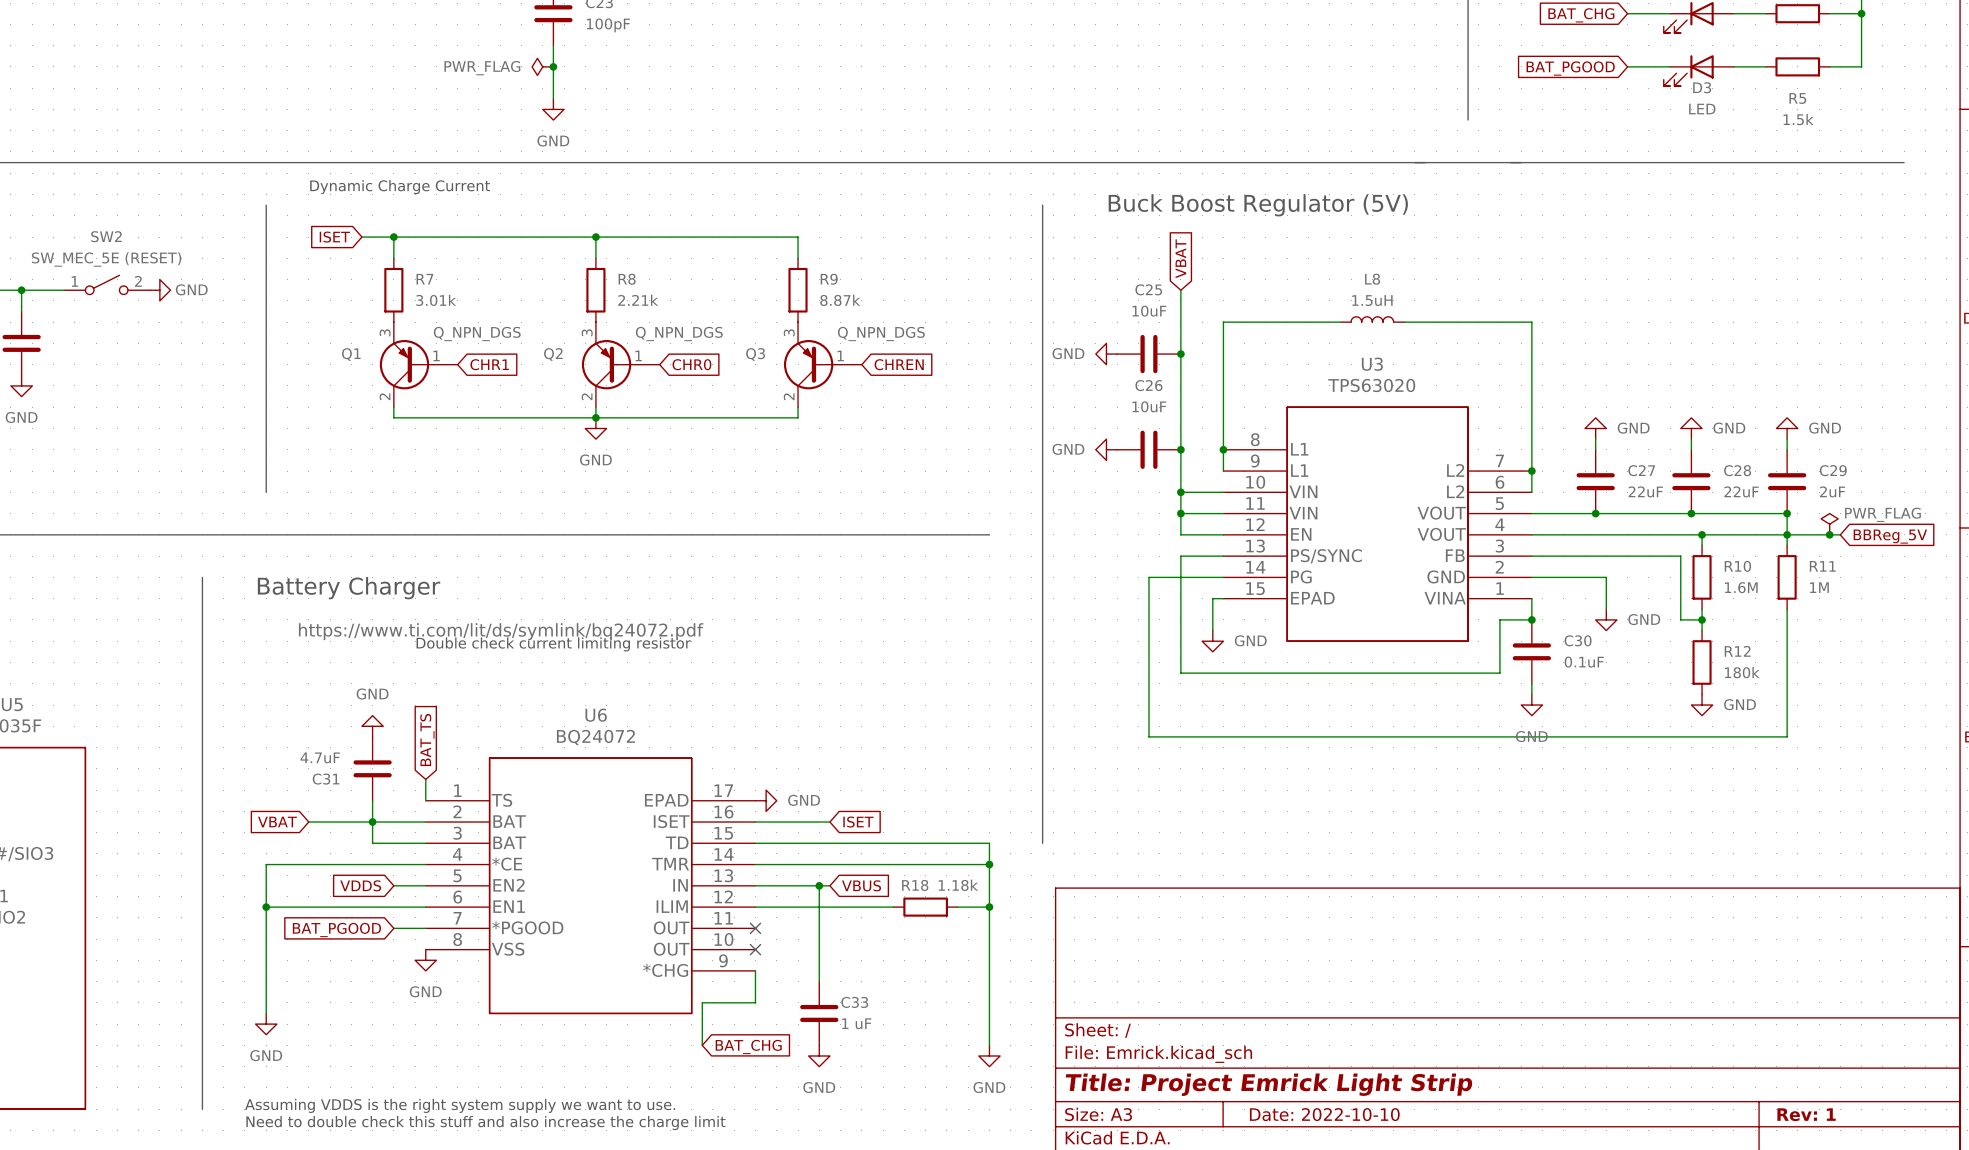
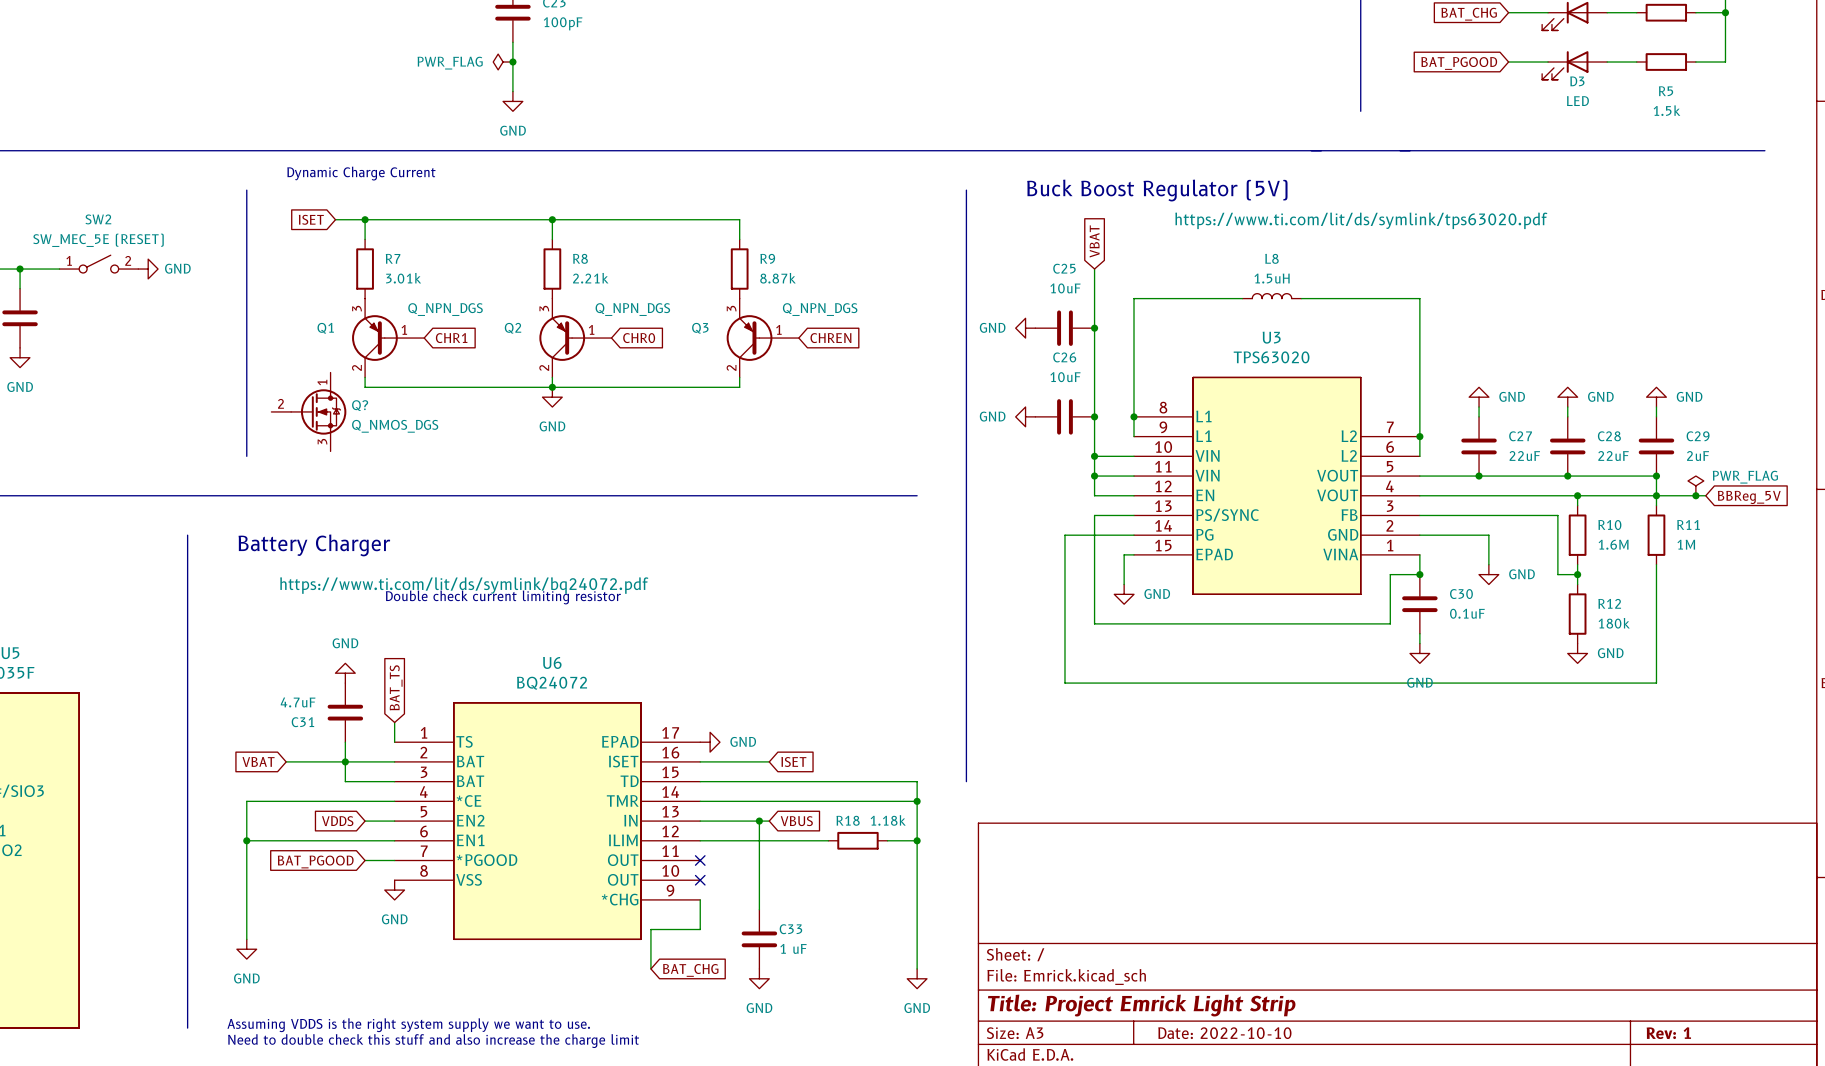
U3 text: none -> https://www.ti.com/lit/ds/symlink/tps63020.pdf (1361, 220)
Q?: none -> Q_NMOS_DGS (308, 411)

